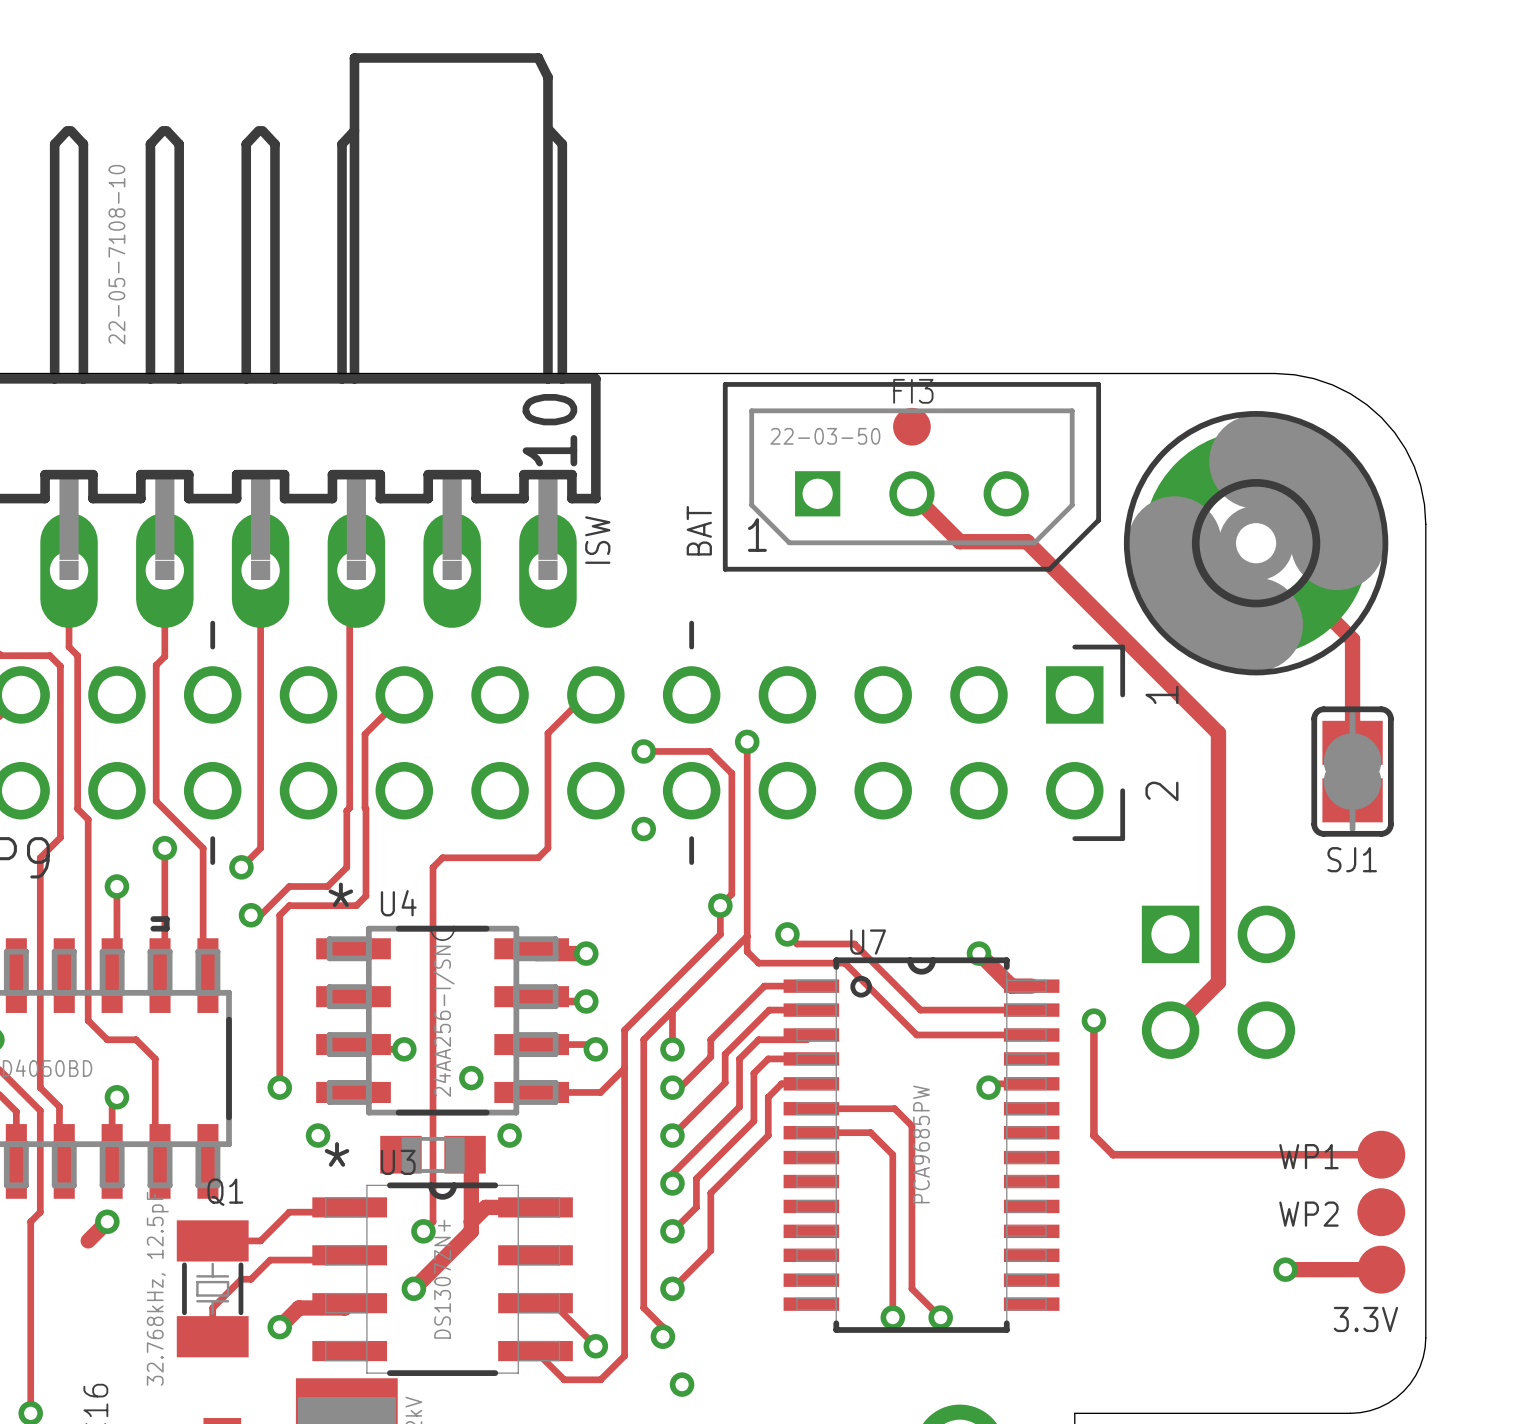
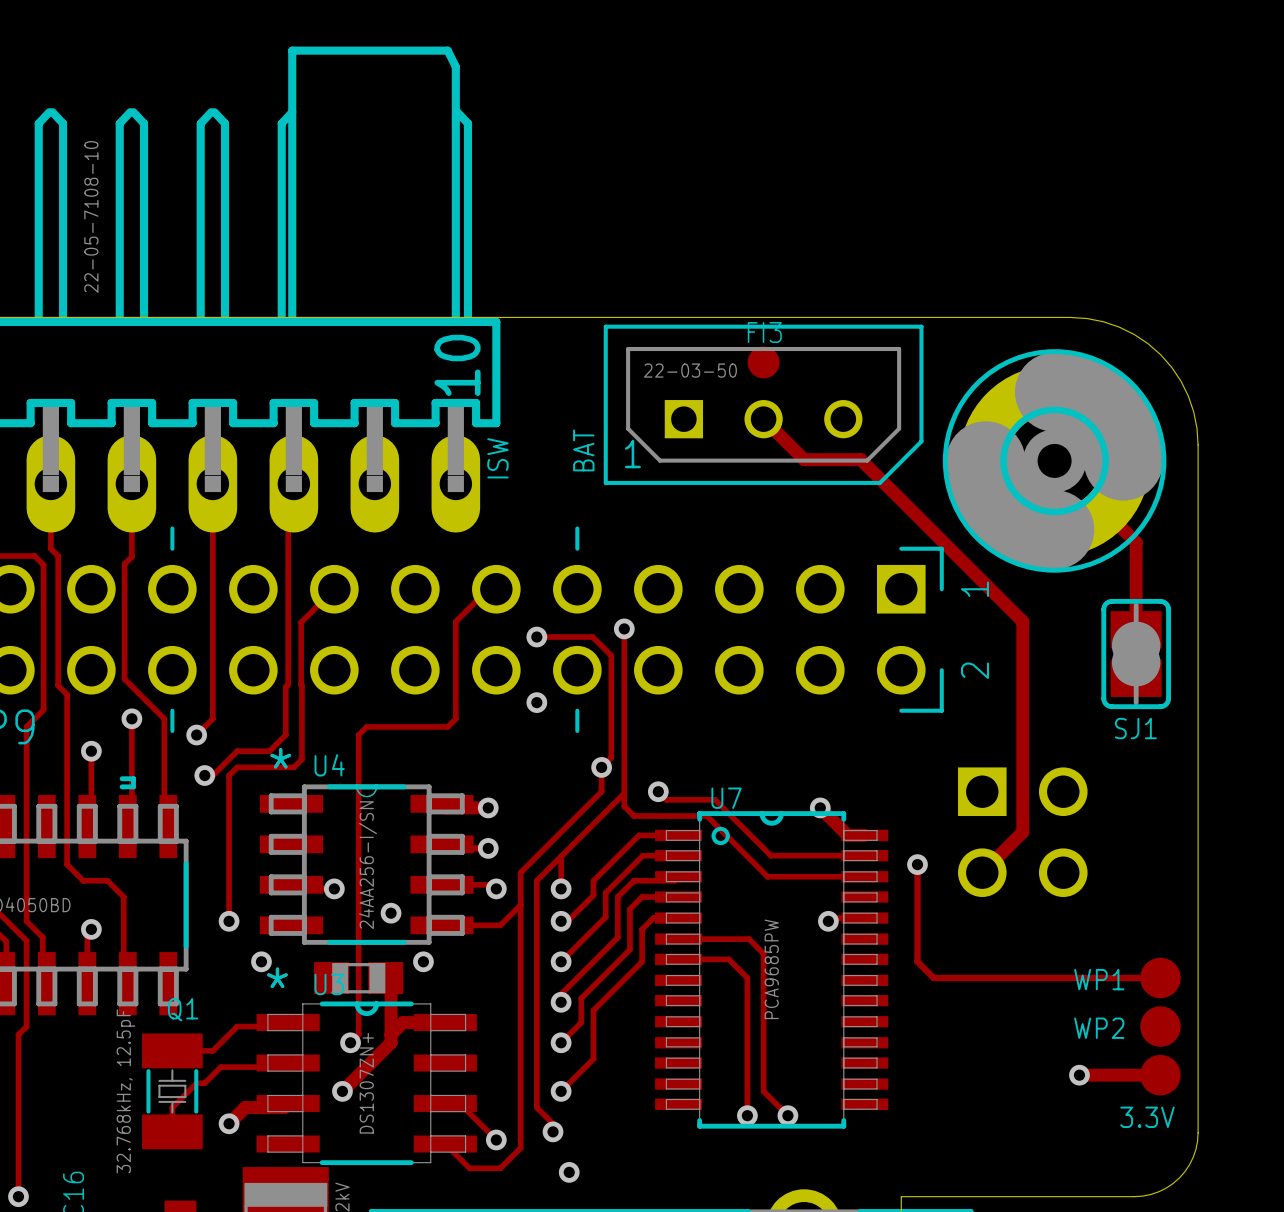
track: (107, 1221) (88, 1240) -> none
via: (107, 1221) -> none

